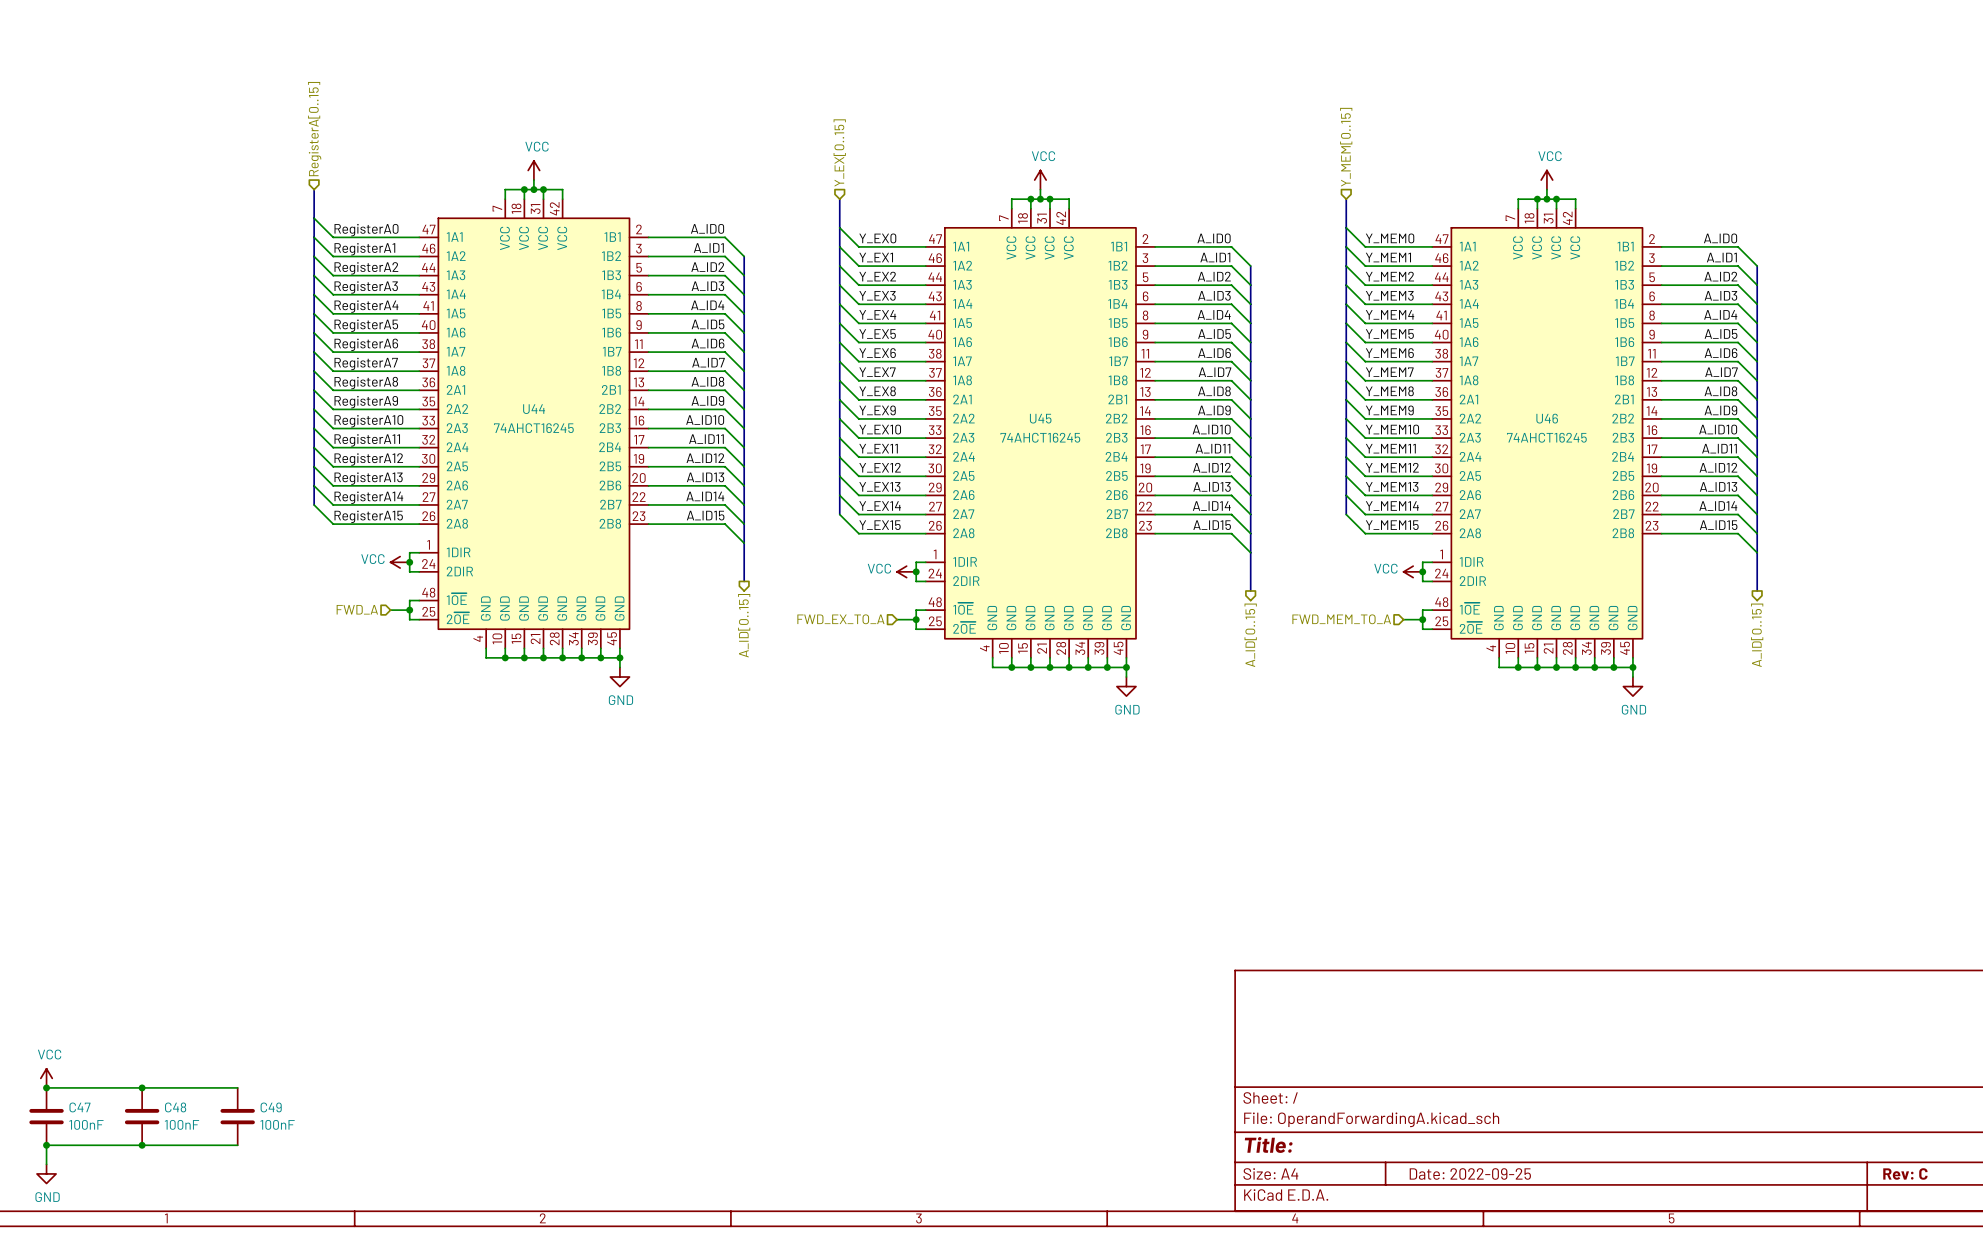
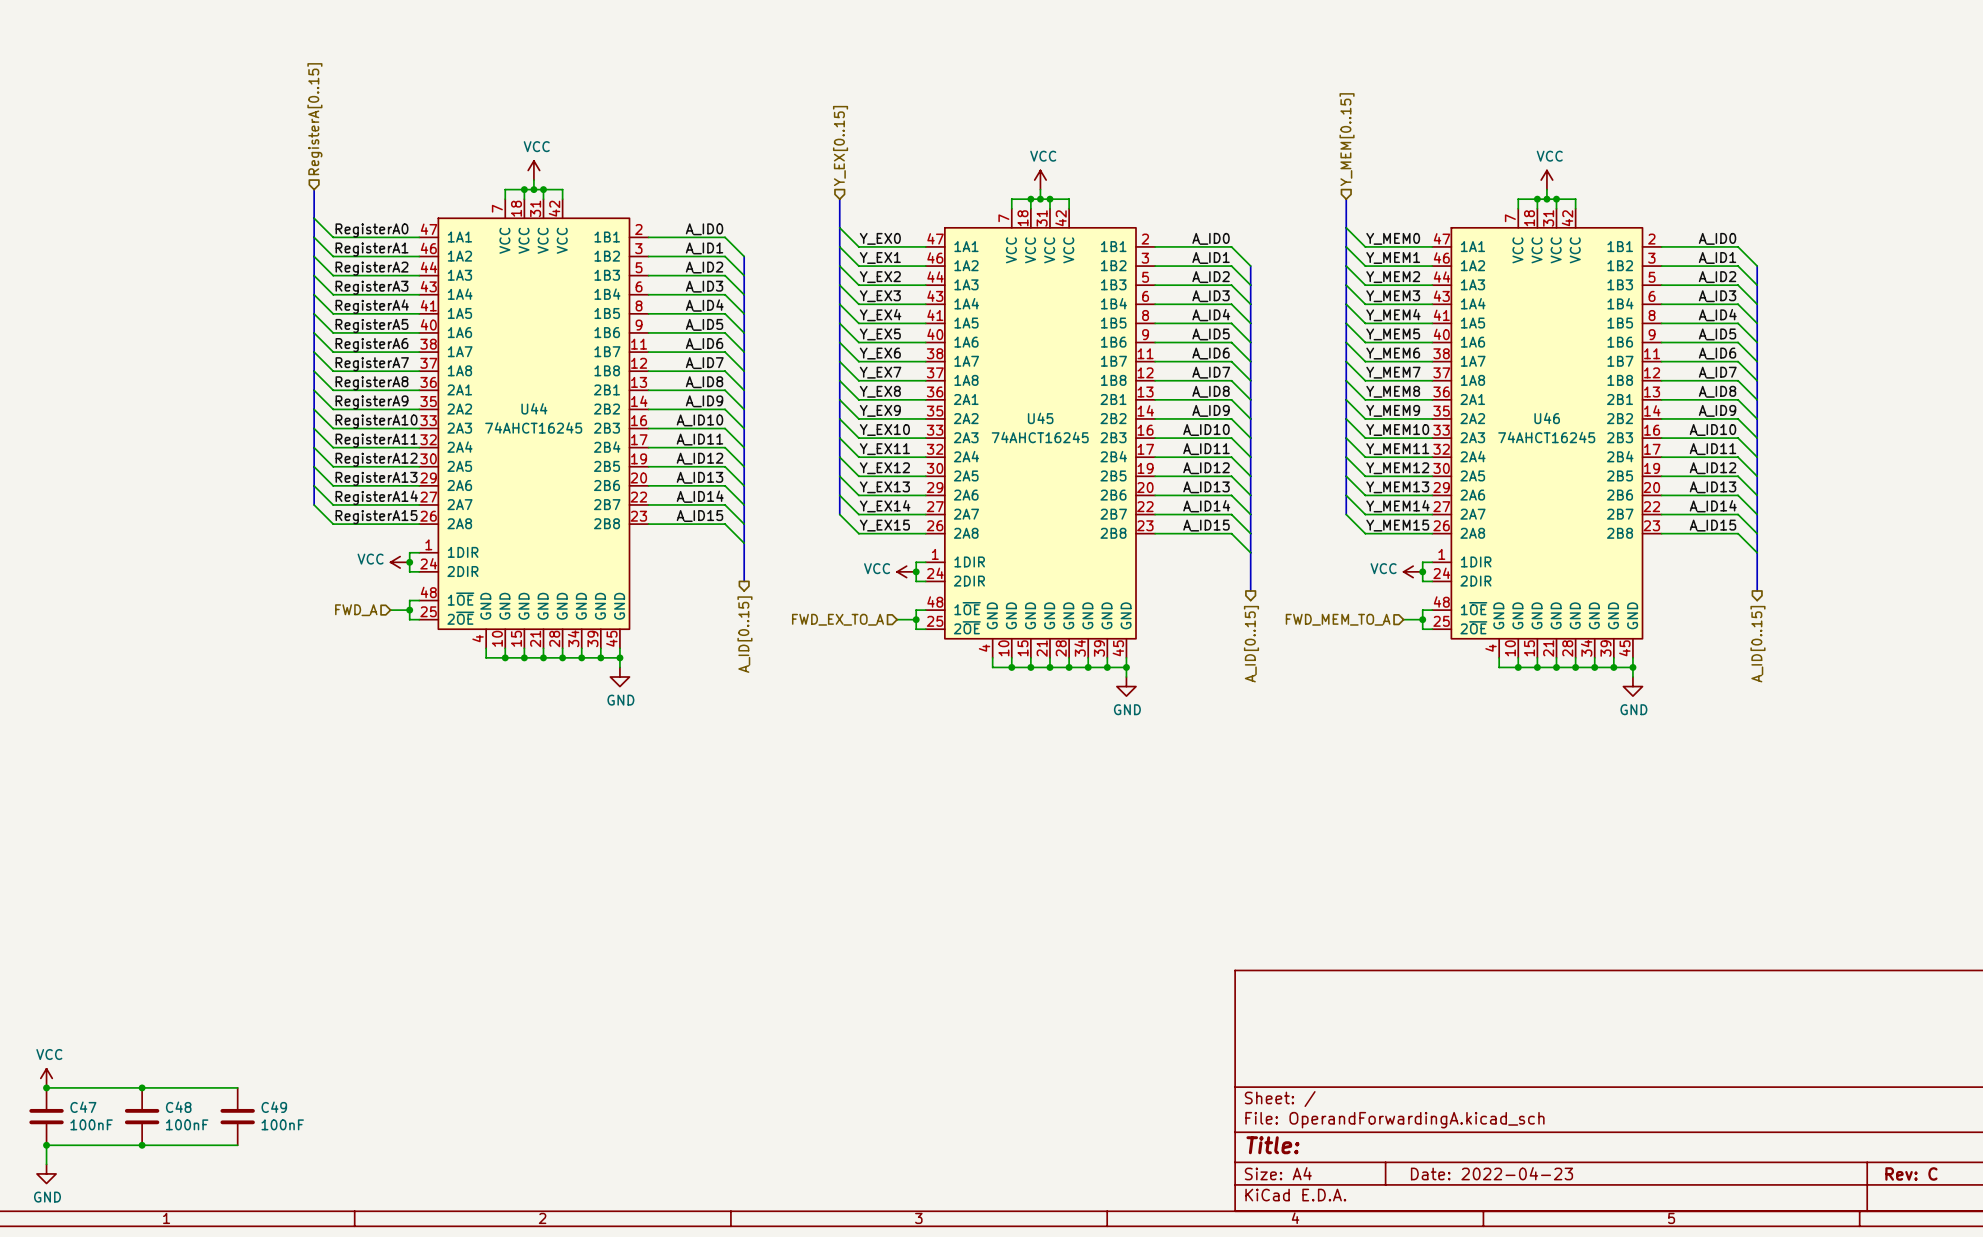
title block: Date: 2022-09-25 (1470, 1173) -> Date: 2022-04-23 (1491, 1173)

